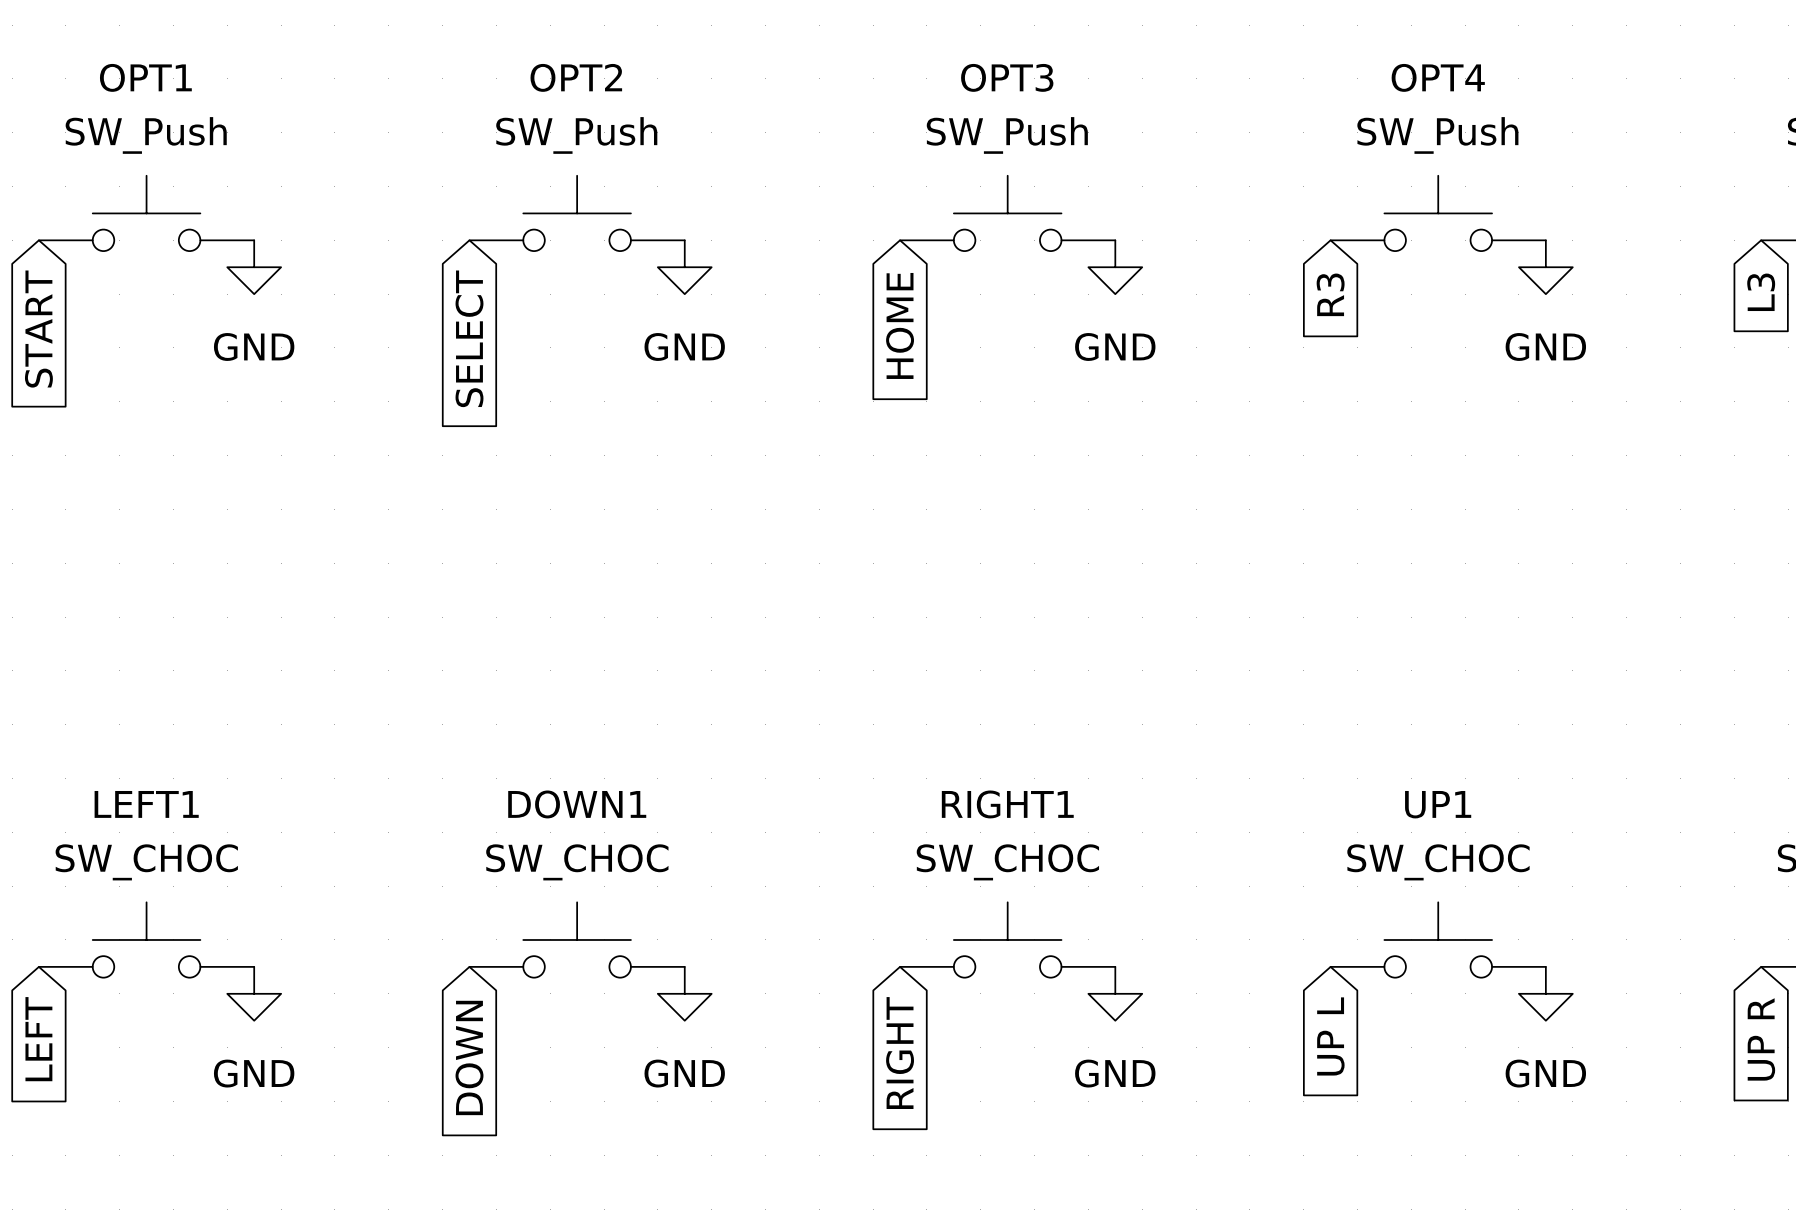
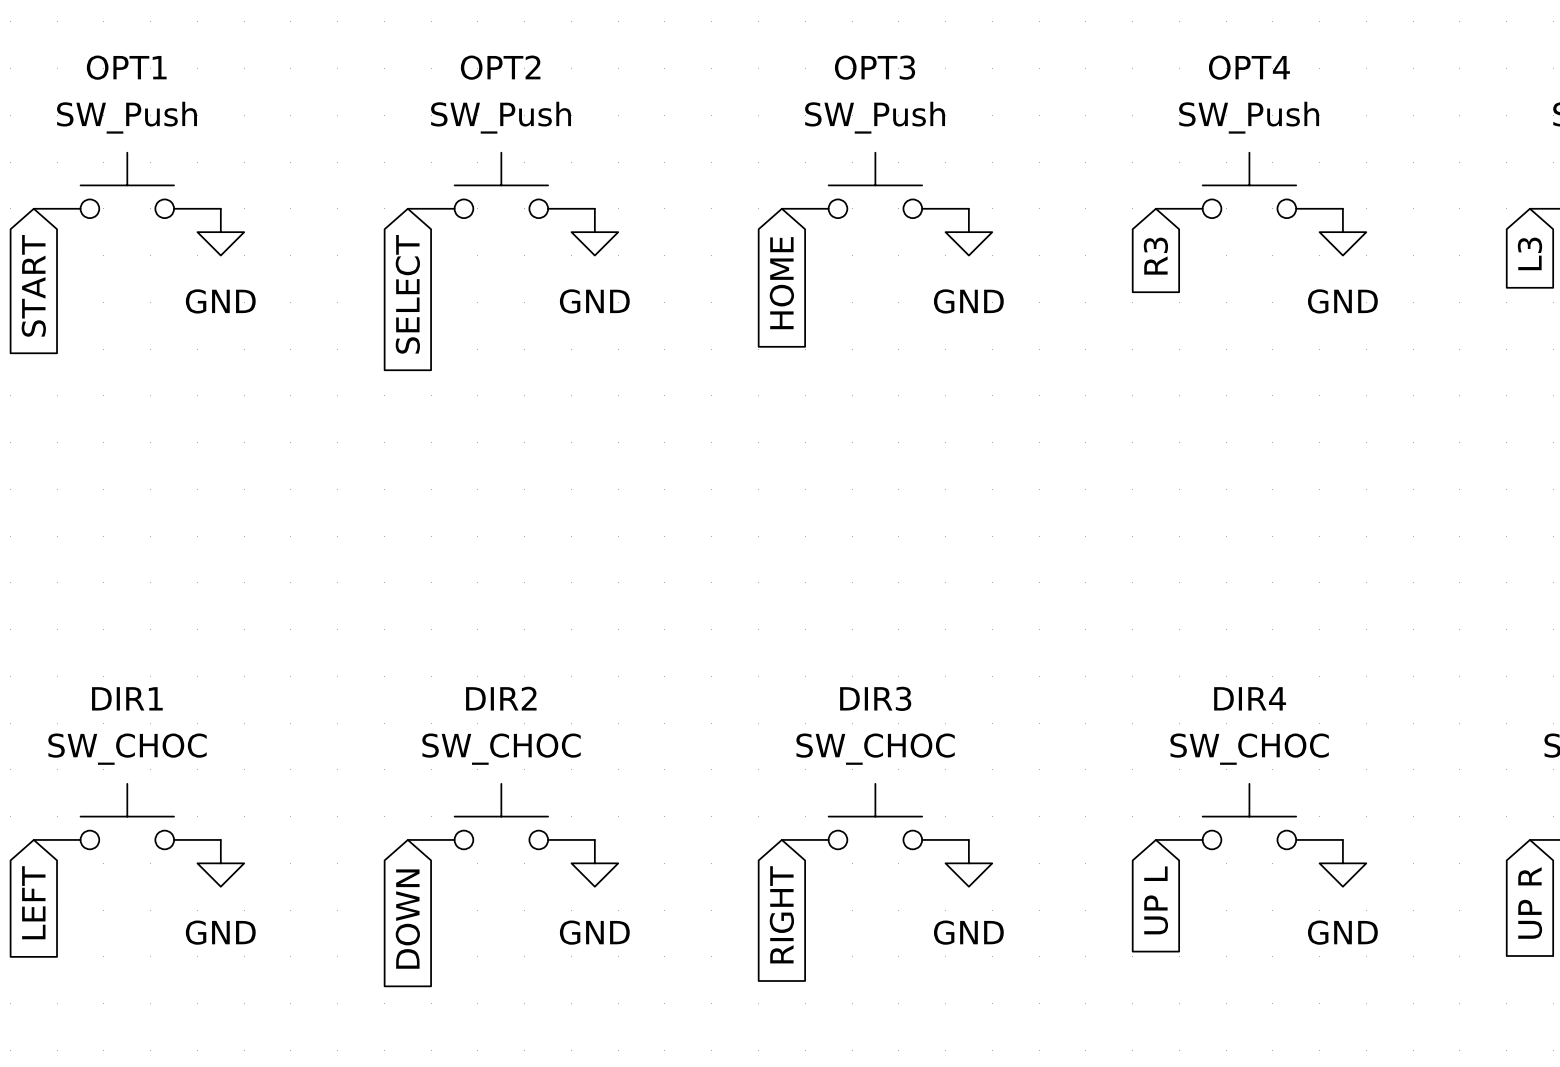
LEFT1 name: LEFT1 (146, 804) -> DIR1 (127, 698)
DOWN1 name: DOWN1 (577, 804) -> DIR2 (501, 698)
RIGHT1 name: RIGHT1 (1007, 804) -> DIR3 (875, 698)
UP1 name: UP1 (1438, 804) -> DIR4 (1250, 698)

